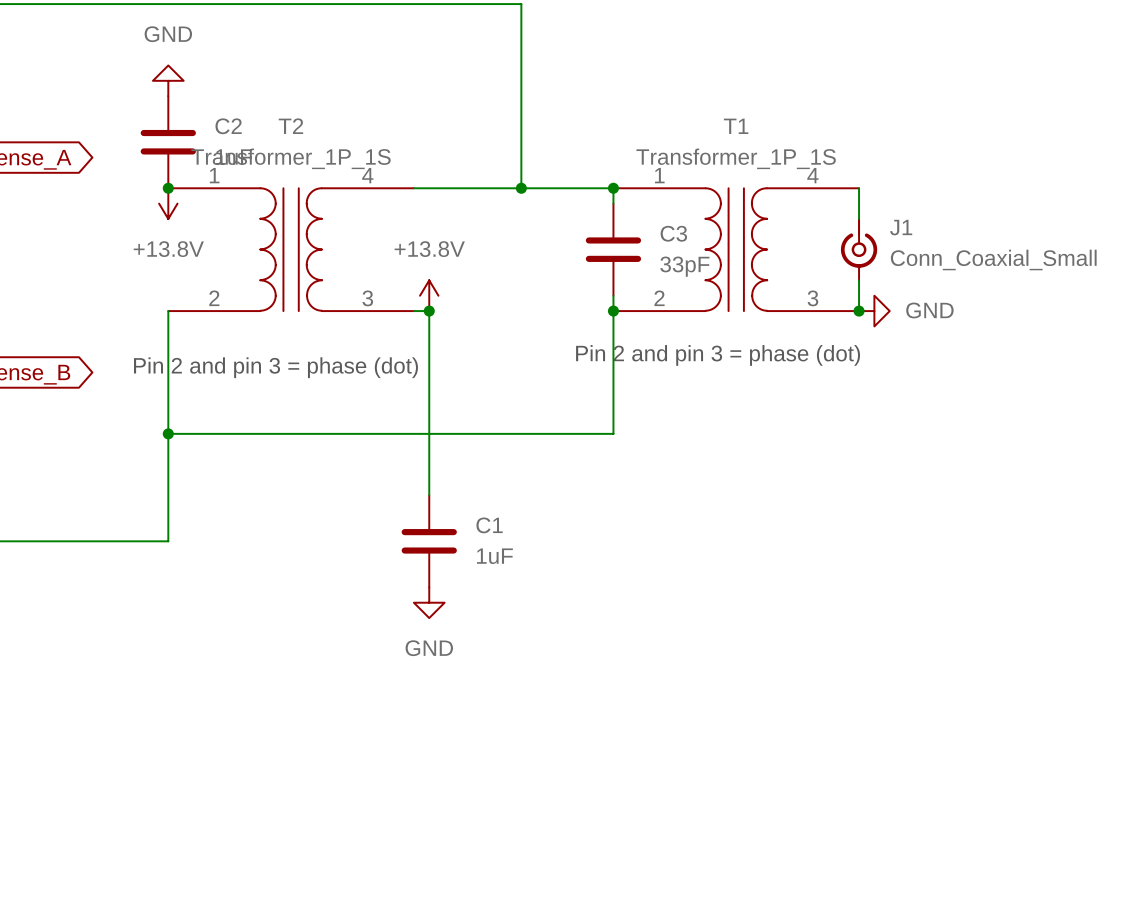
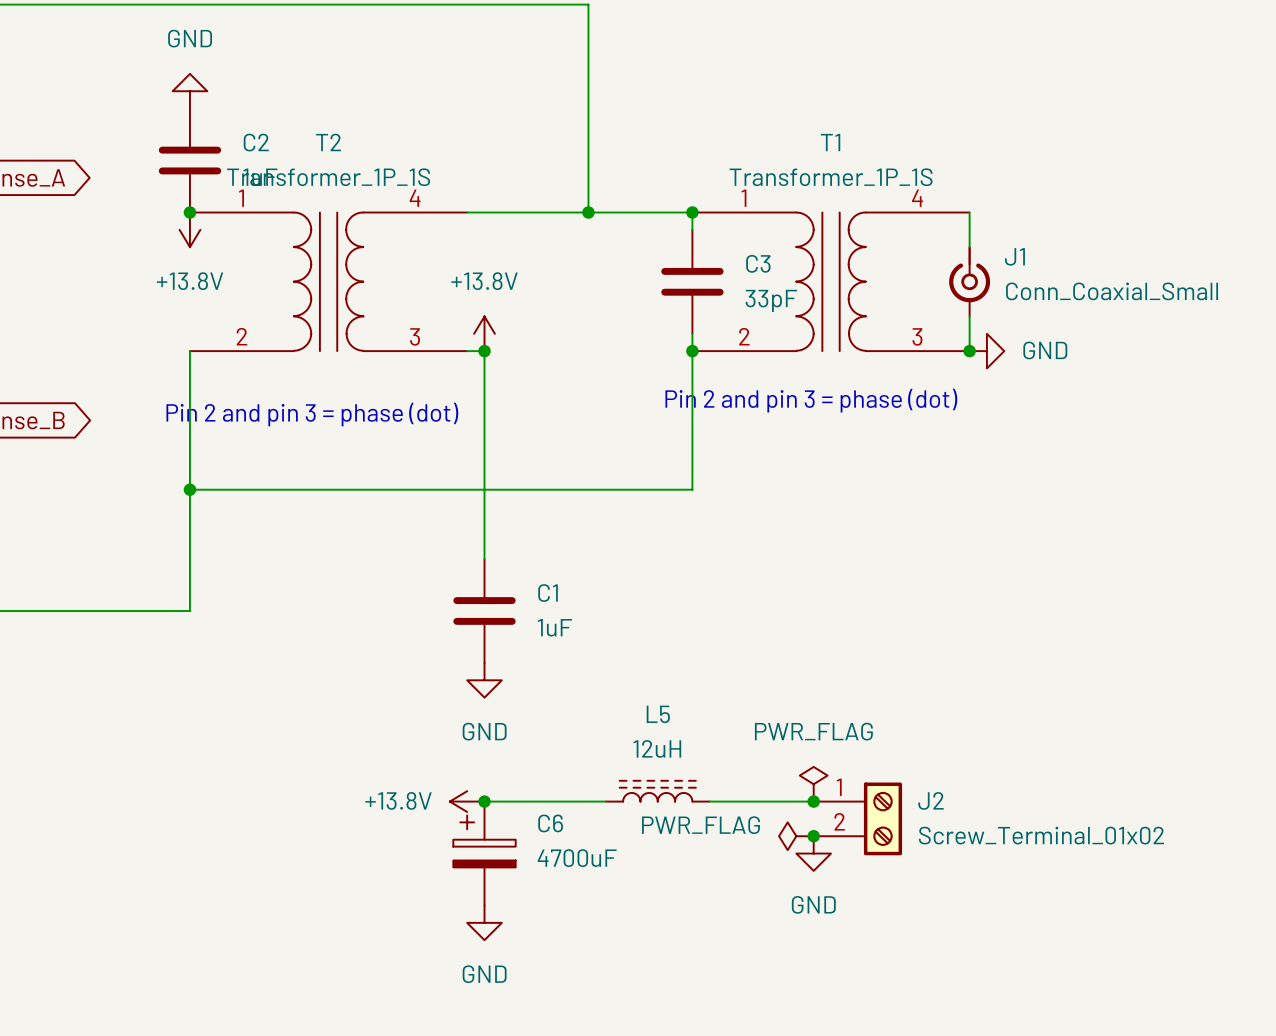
power symbol: none -> PWR_FLAG (813, 784)
L5: none -> 12uH (657, 791)
power symbol: none -> +13.8V (467, 801)
wire: none -> (484, 801) (605, 801)
junction: none -> (484, 801)
wire: none -> (709, 801) (813, 801)
junction: none -> (813, 801)
J2: none -> Screw_Terminal_01x02 (857, 818)
power symbol: none -> PWR_FLAG (796, 836)
junction: none -> (813, 836)
C6: none -> 4700uF (484, 853)
power symbol: none -> GND (813, 853)
power symbol: none -> GND (484, 922)

